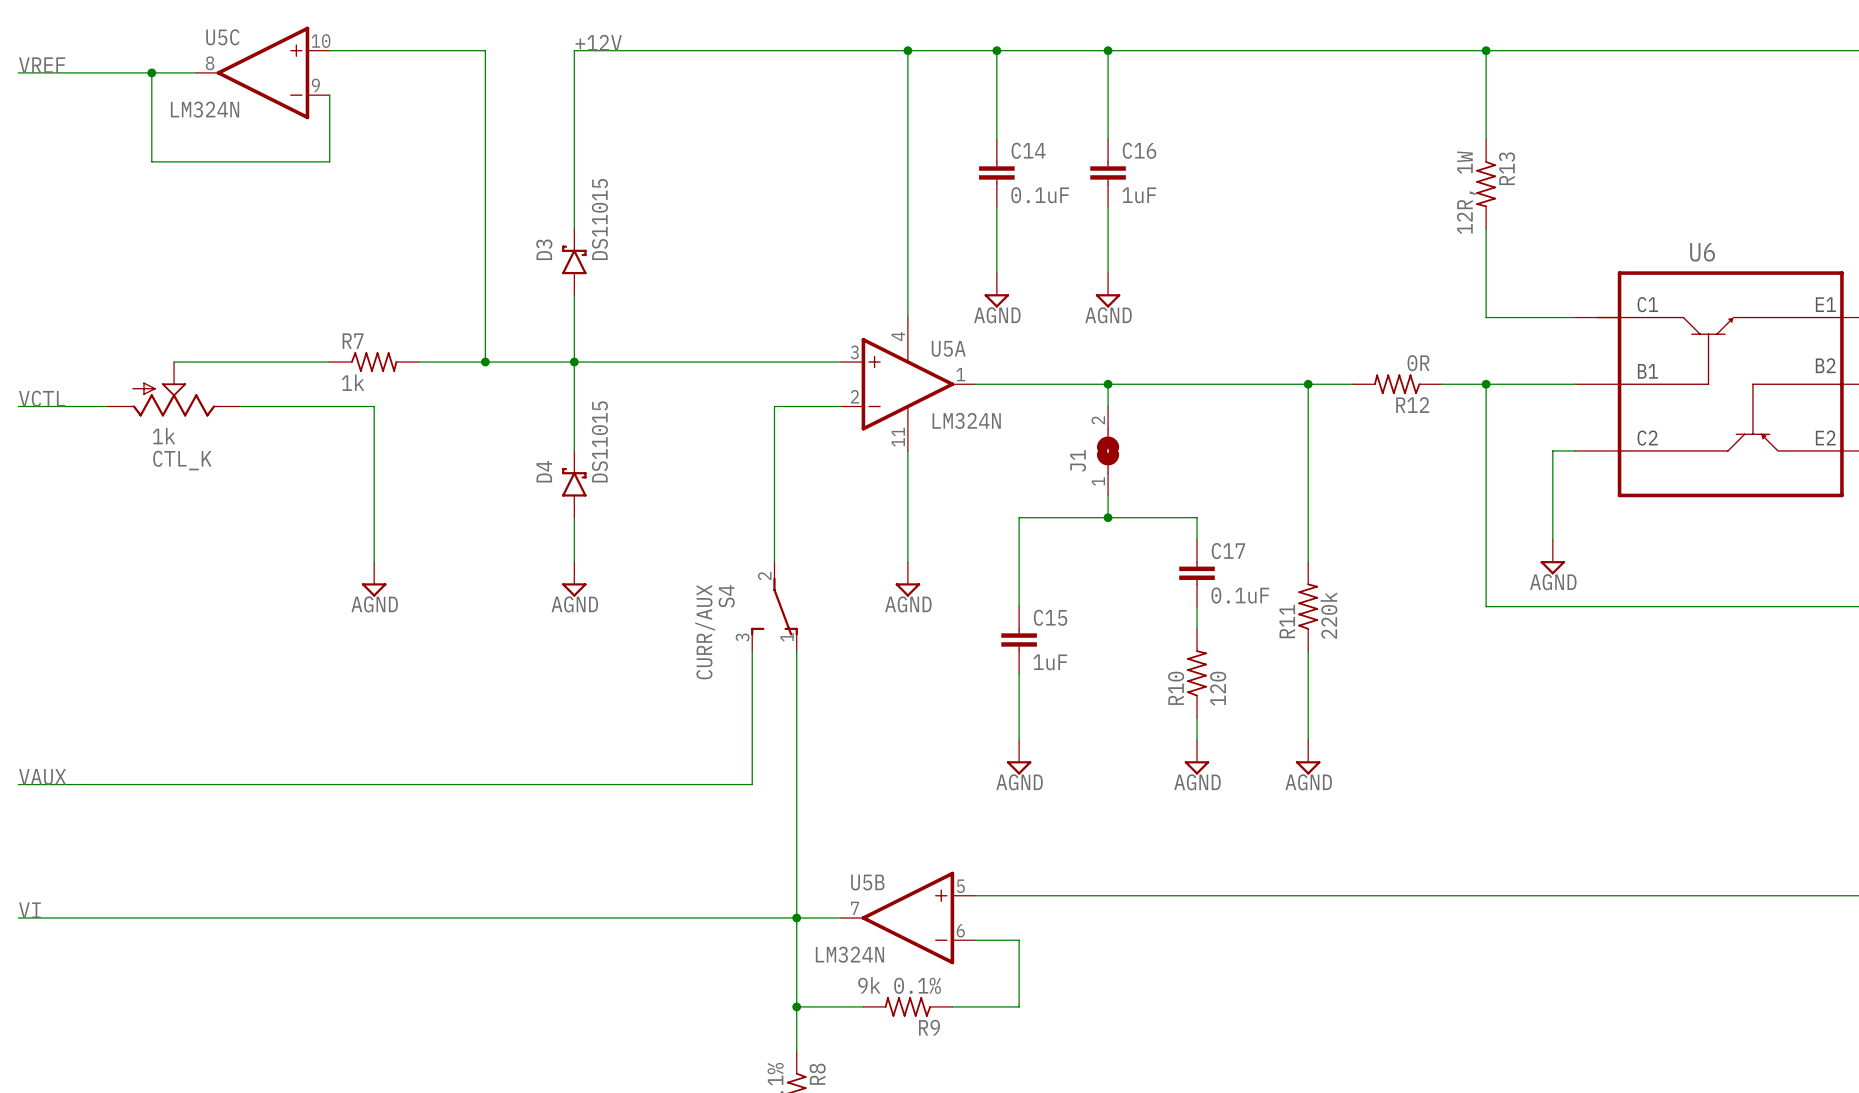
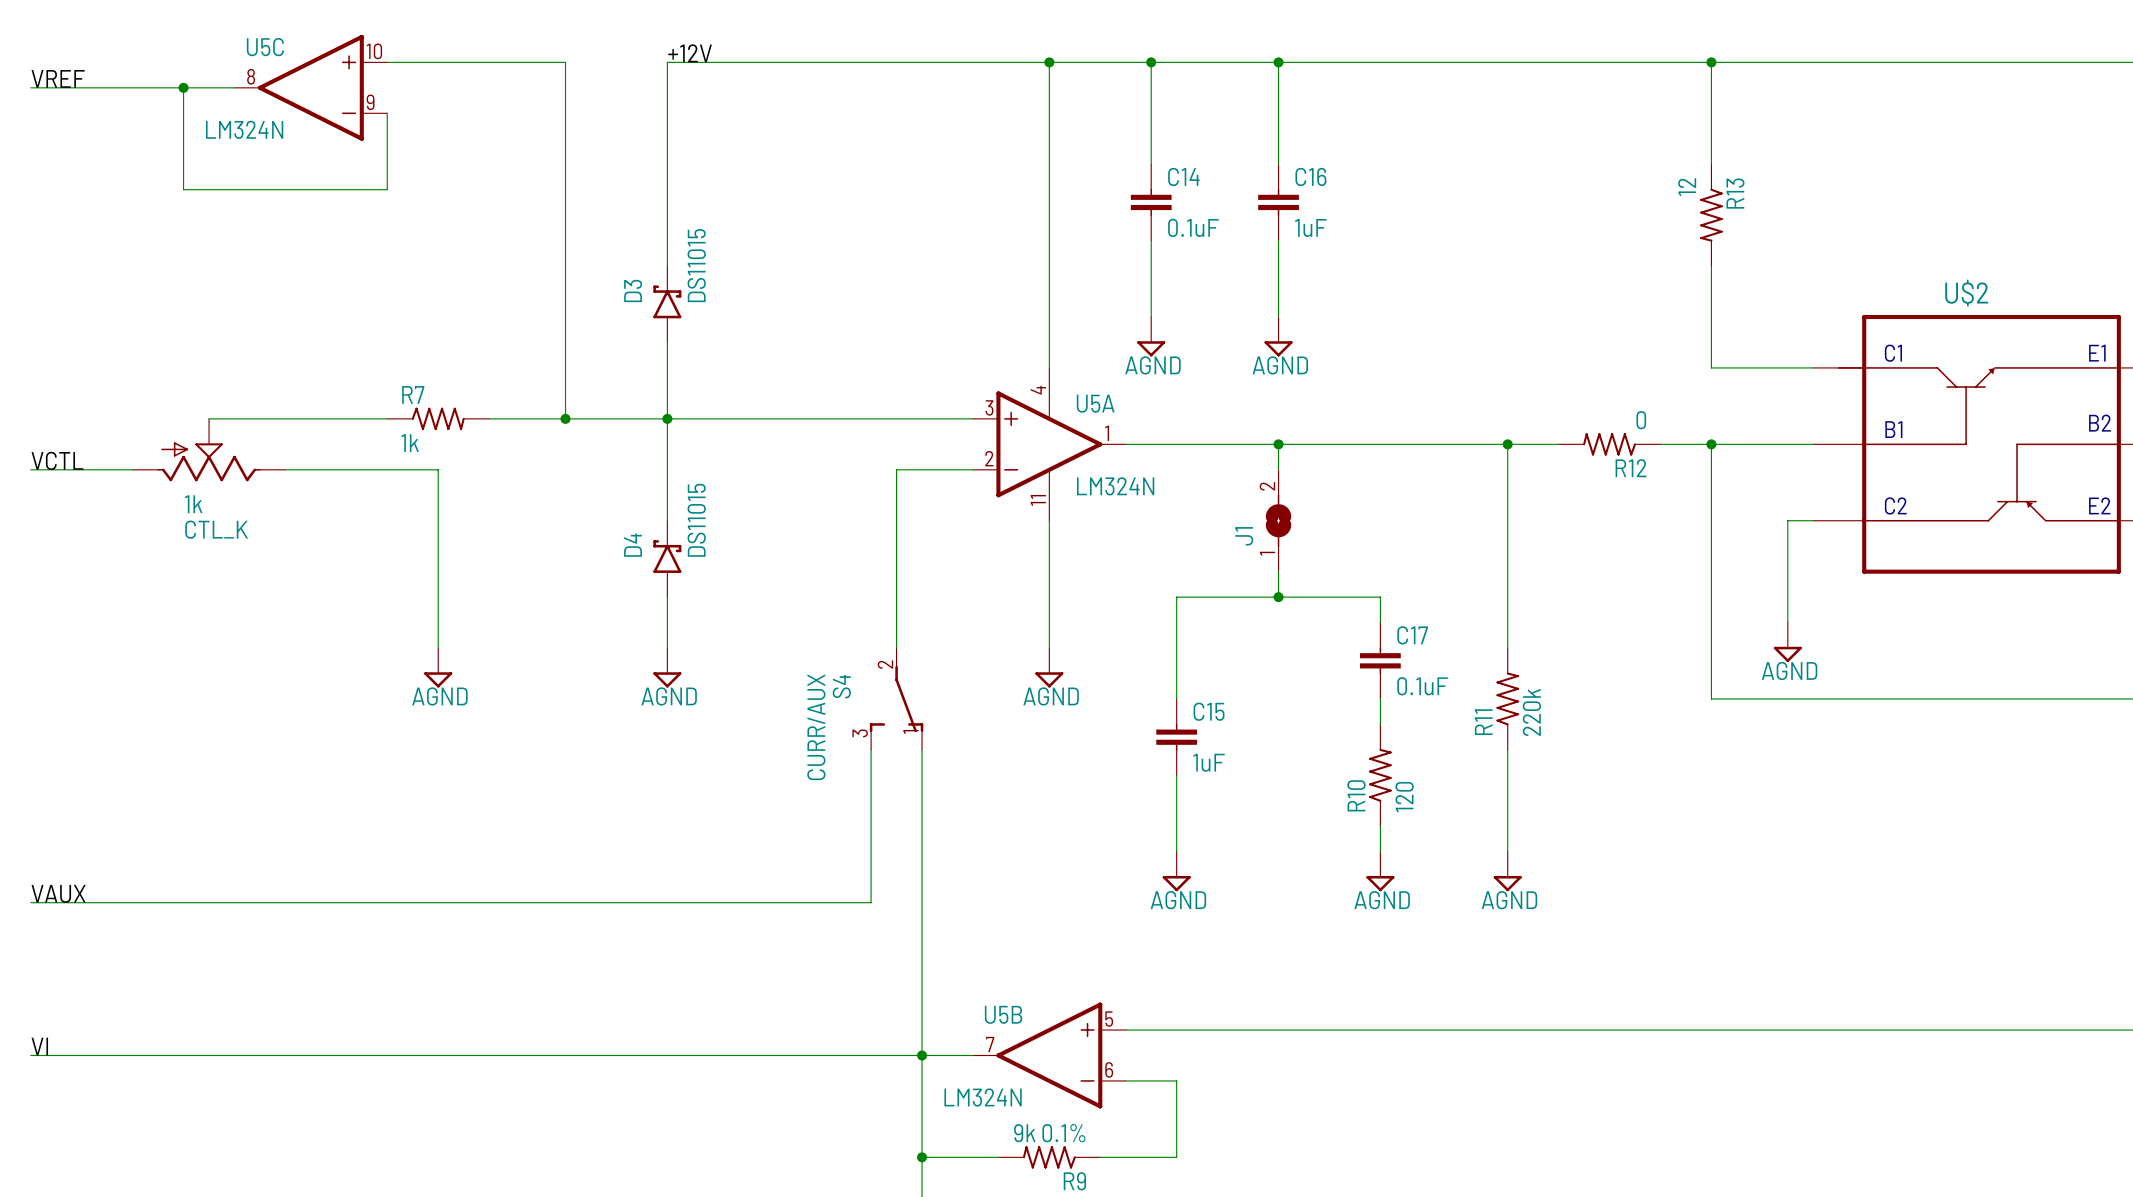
R13 value: 12R, 1W (1466, 192) -> 12 (1687, 187)
U6 name: U6 (1702, 252) -> U$2 (1966, 292)
R12 value: 0R (1418, 363) -> 0 (1641, 420)

